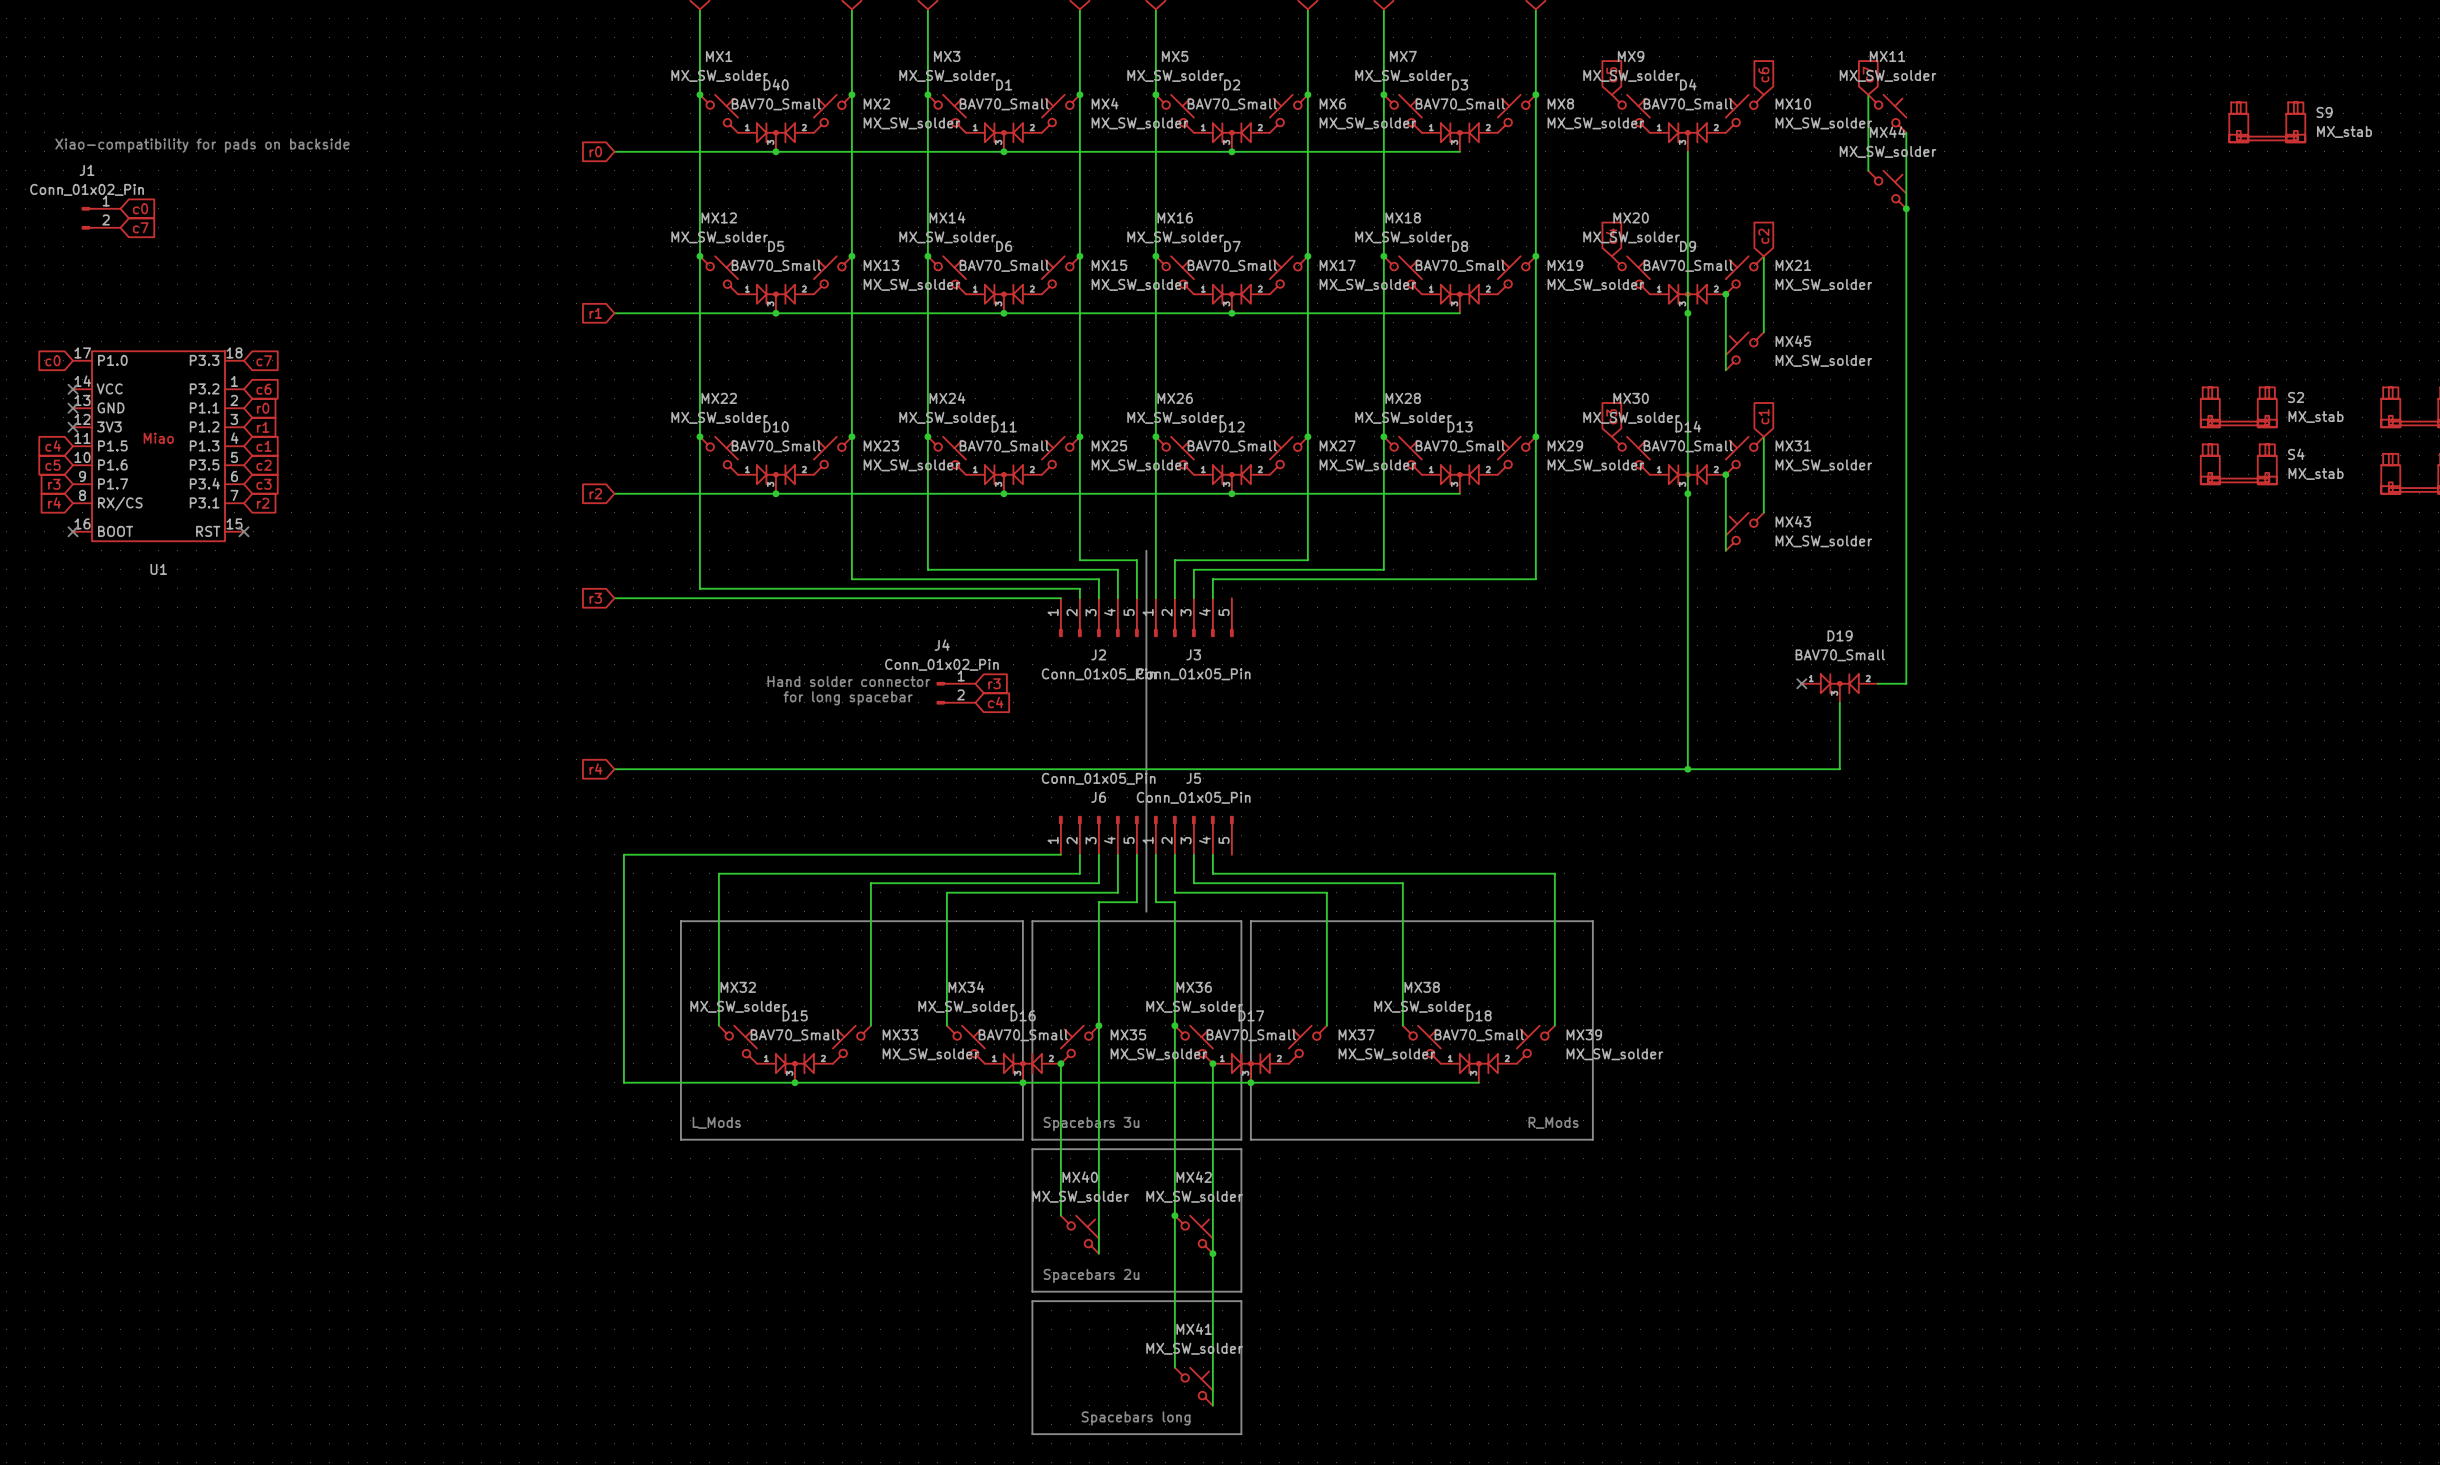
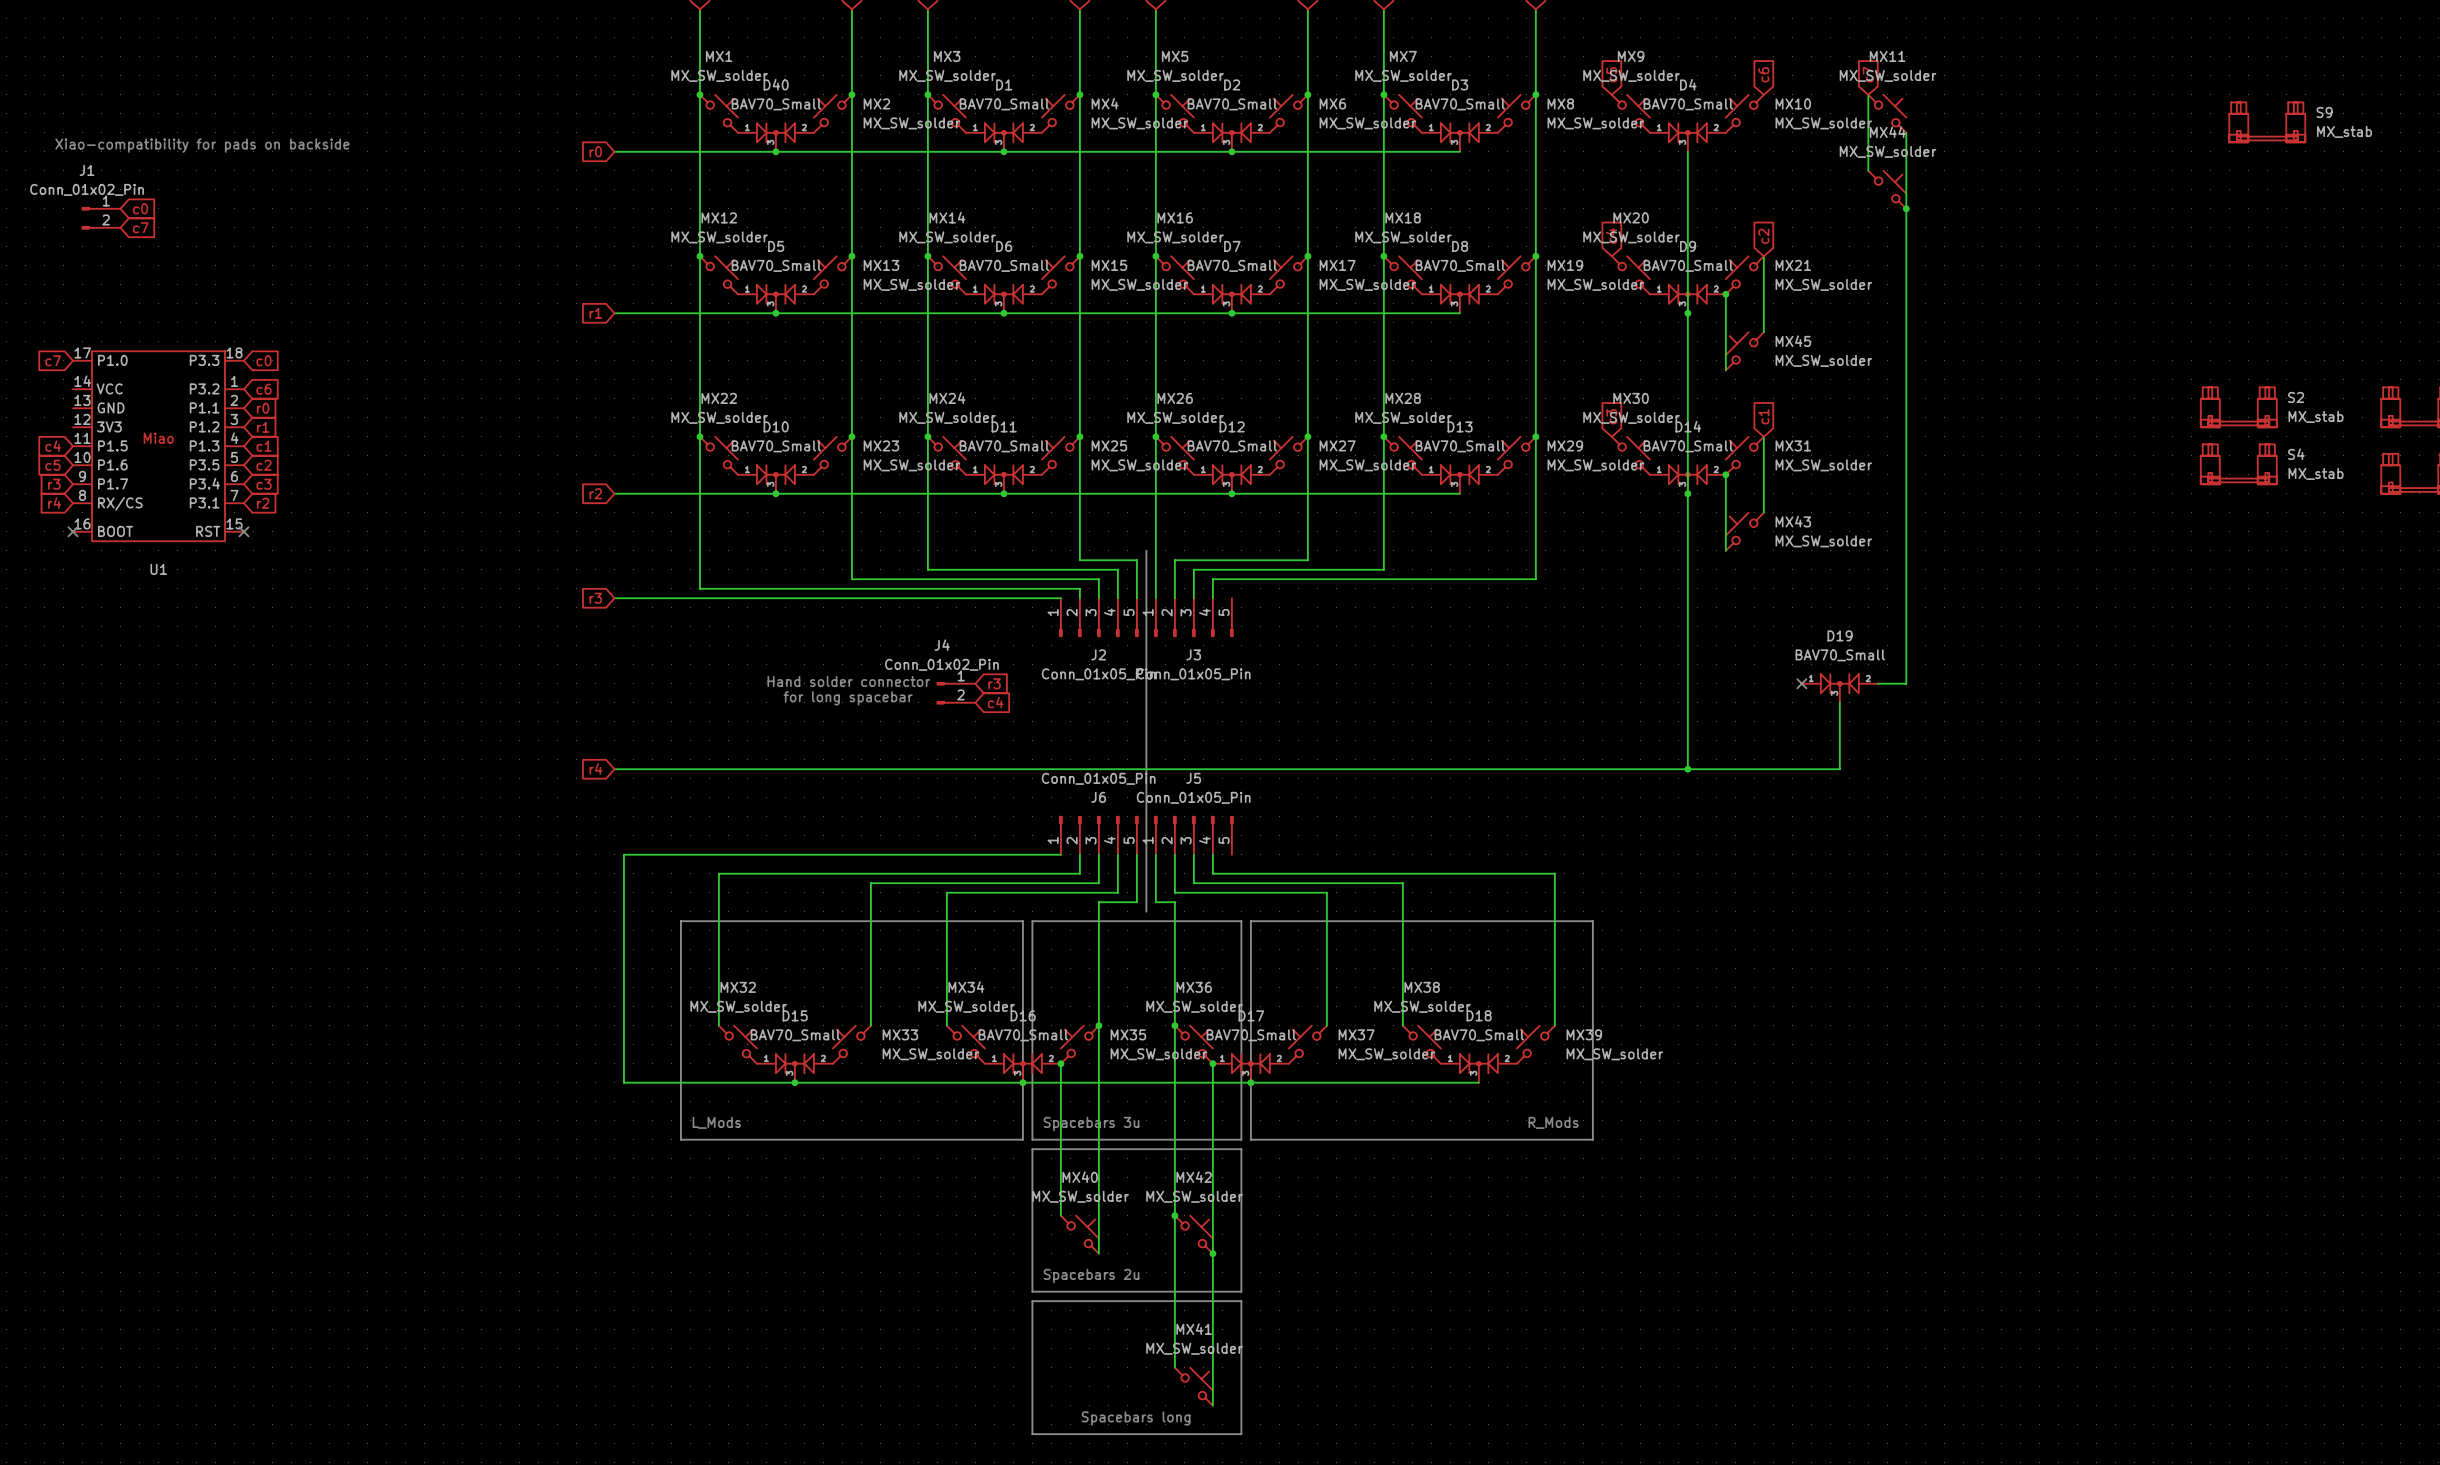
global label: c0 (52, 360) -> c7 (53, 360)
global label: c7 (264, 360) -> c0 (264, 360)
no-connect mark: (73, 389) -> none
no-connect mark: (73, 408) -> none
no-connect mark: (73, 427) -> none

